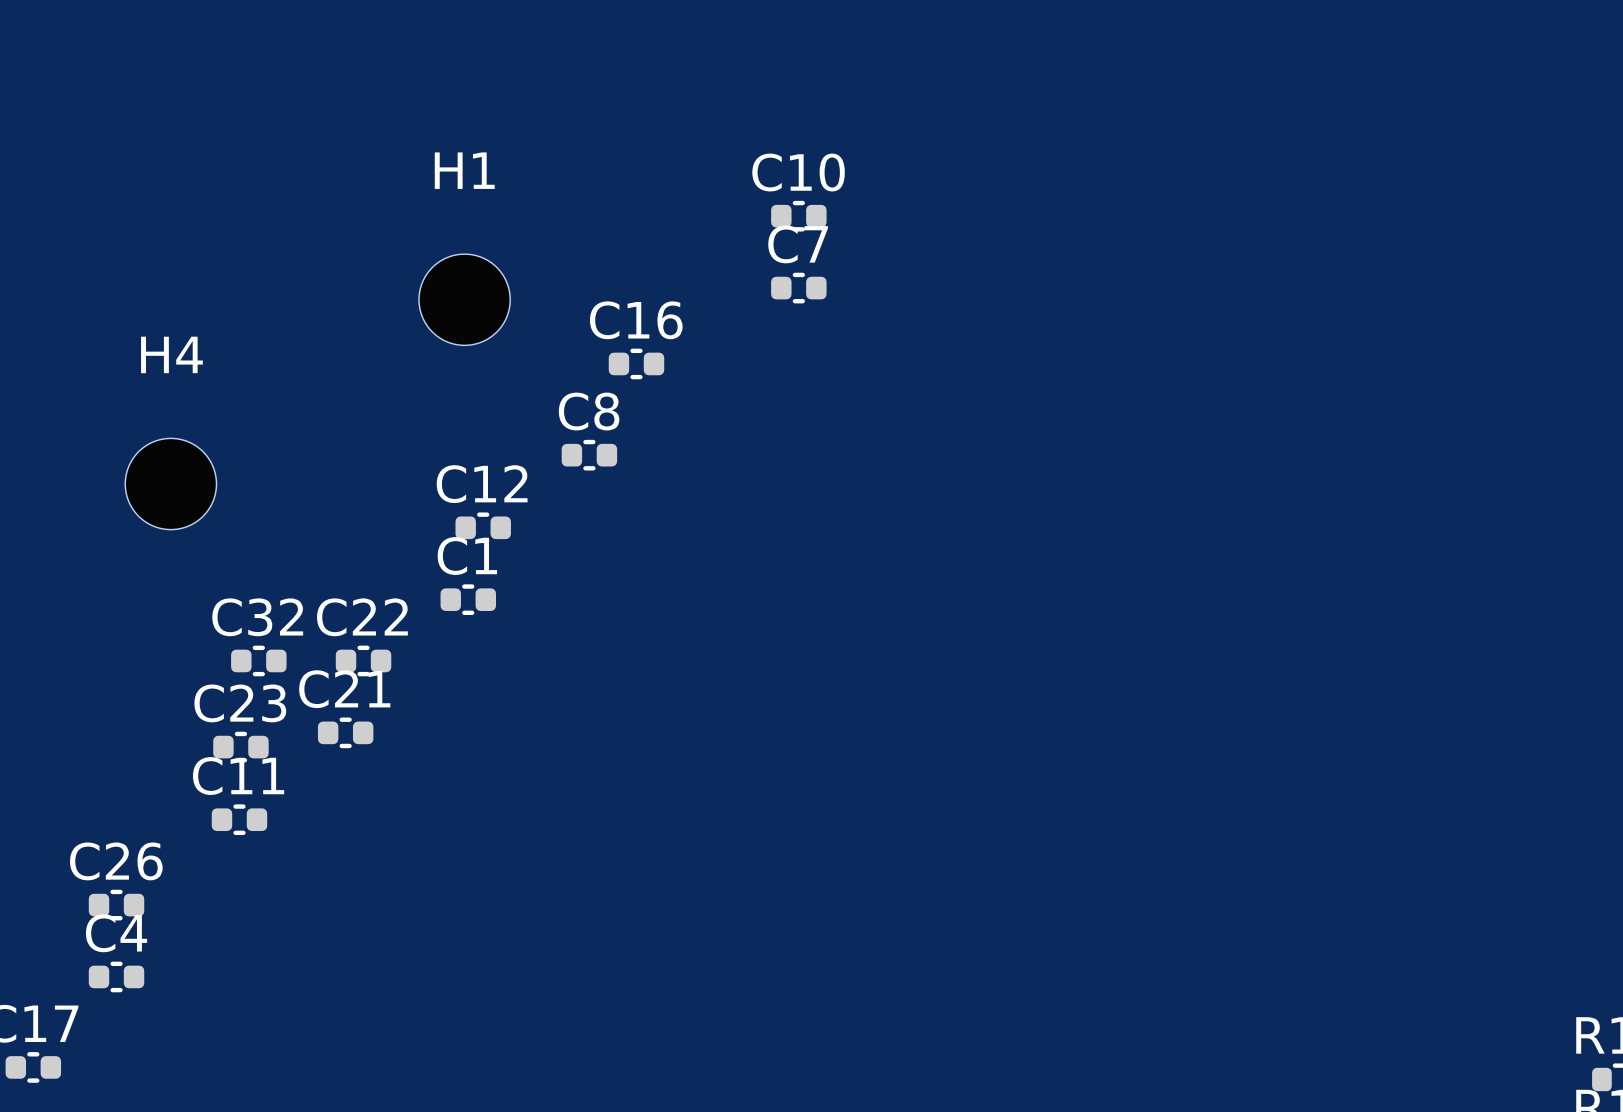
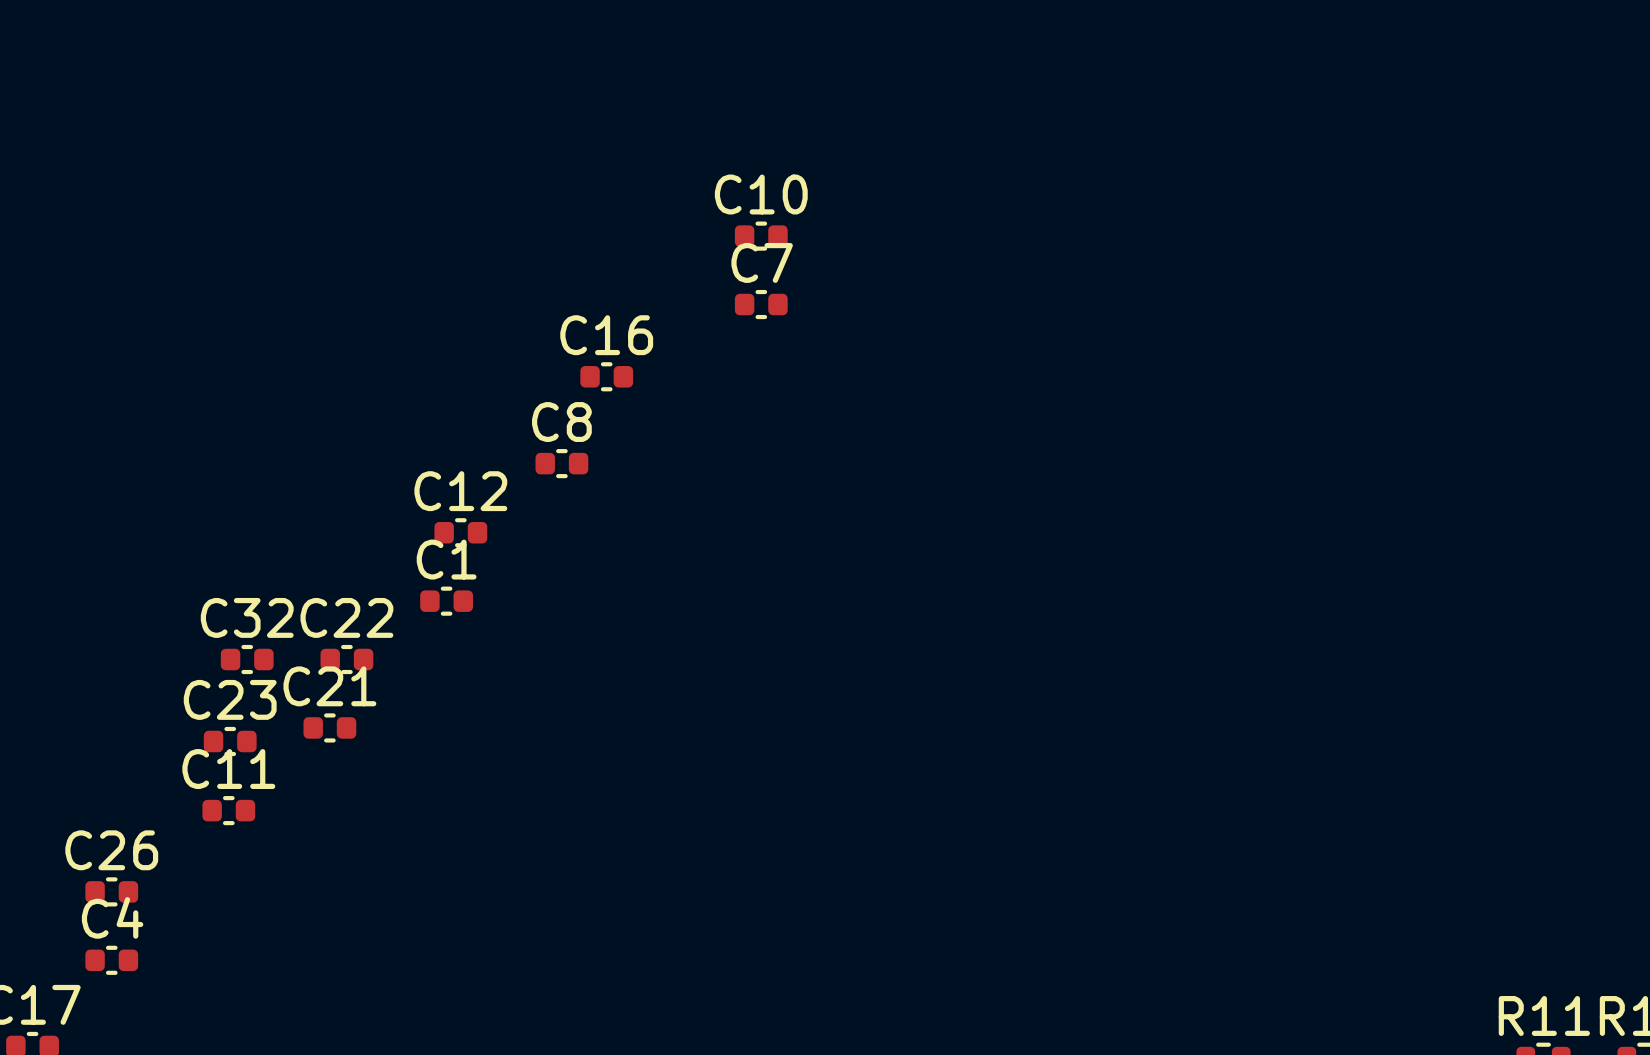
H1: (464, 299) -> none
H4: (170, 484) -> none

